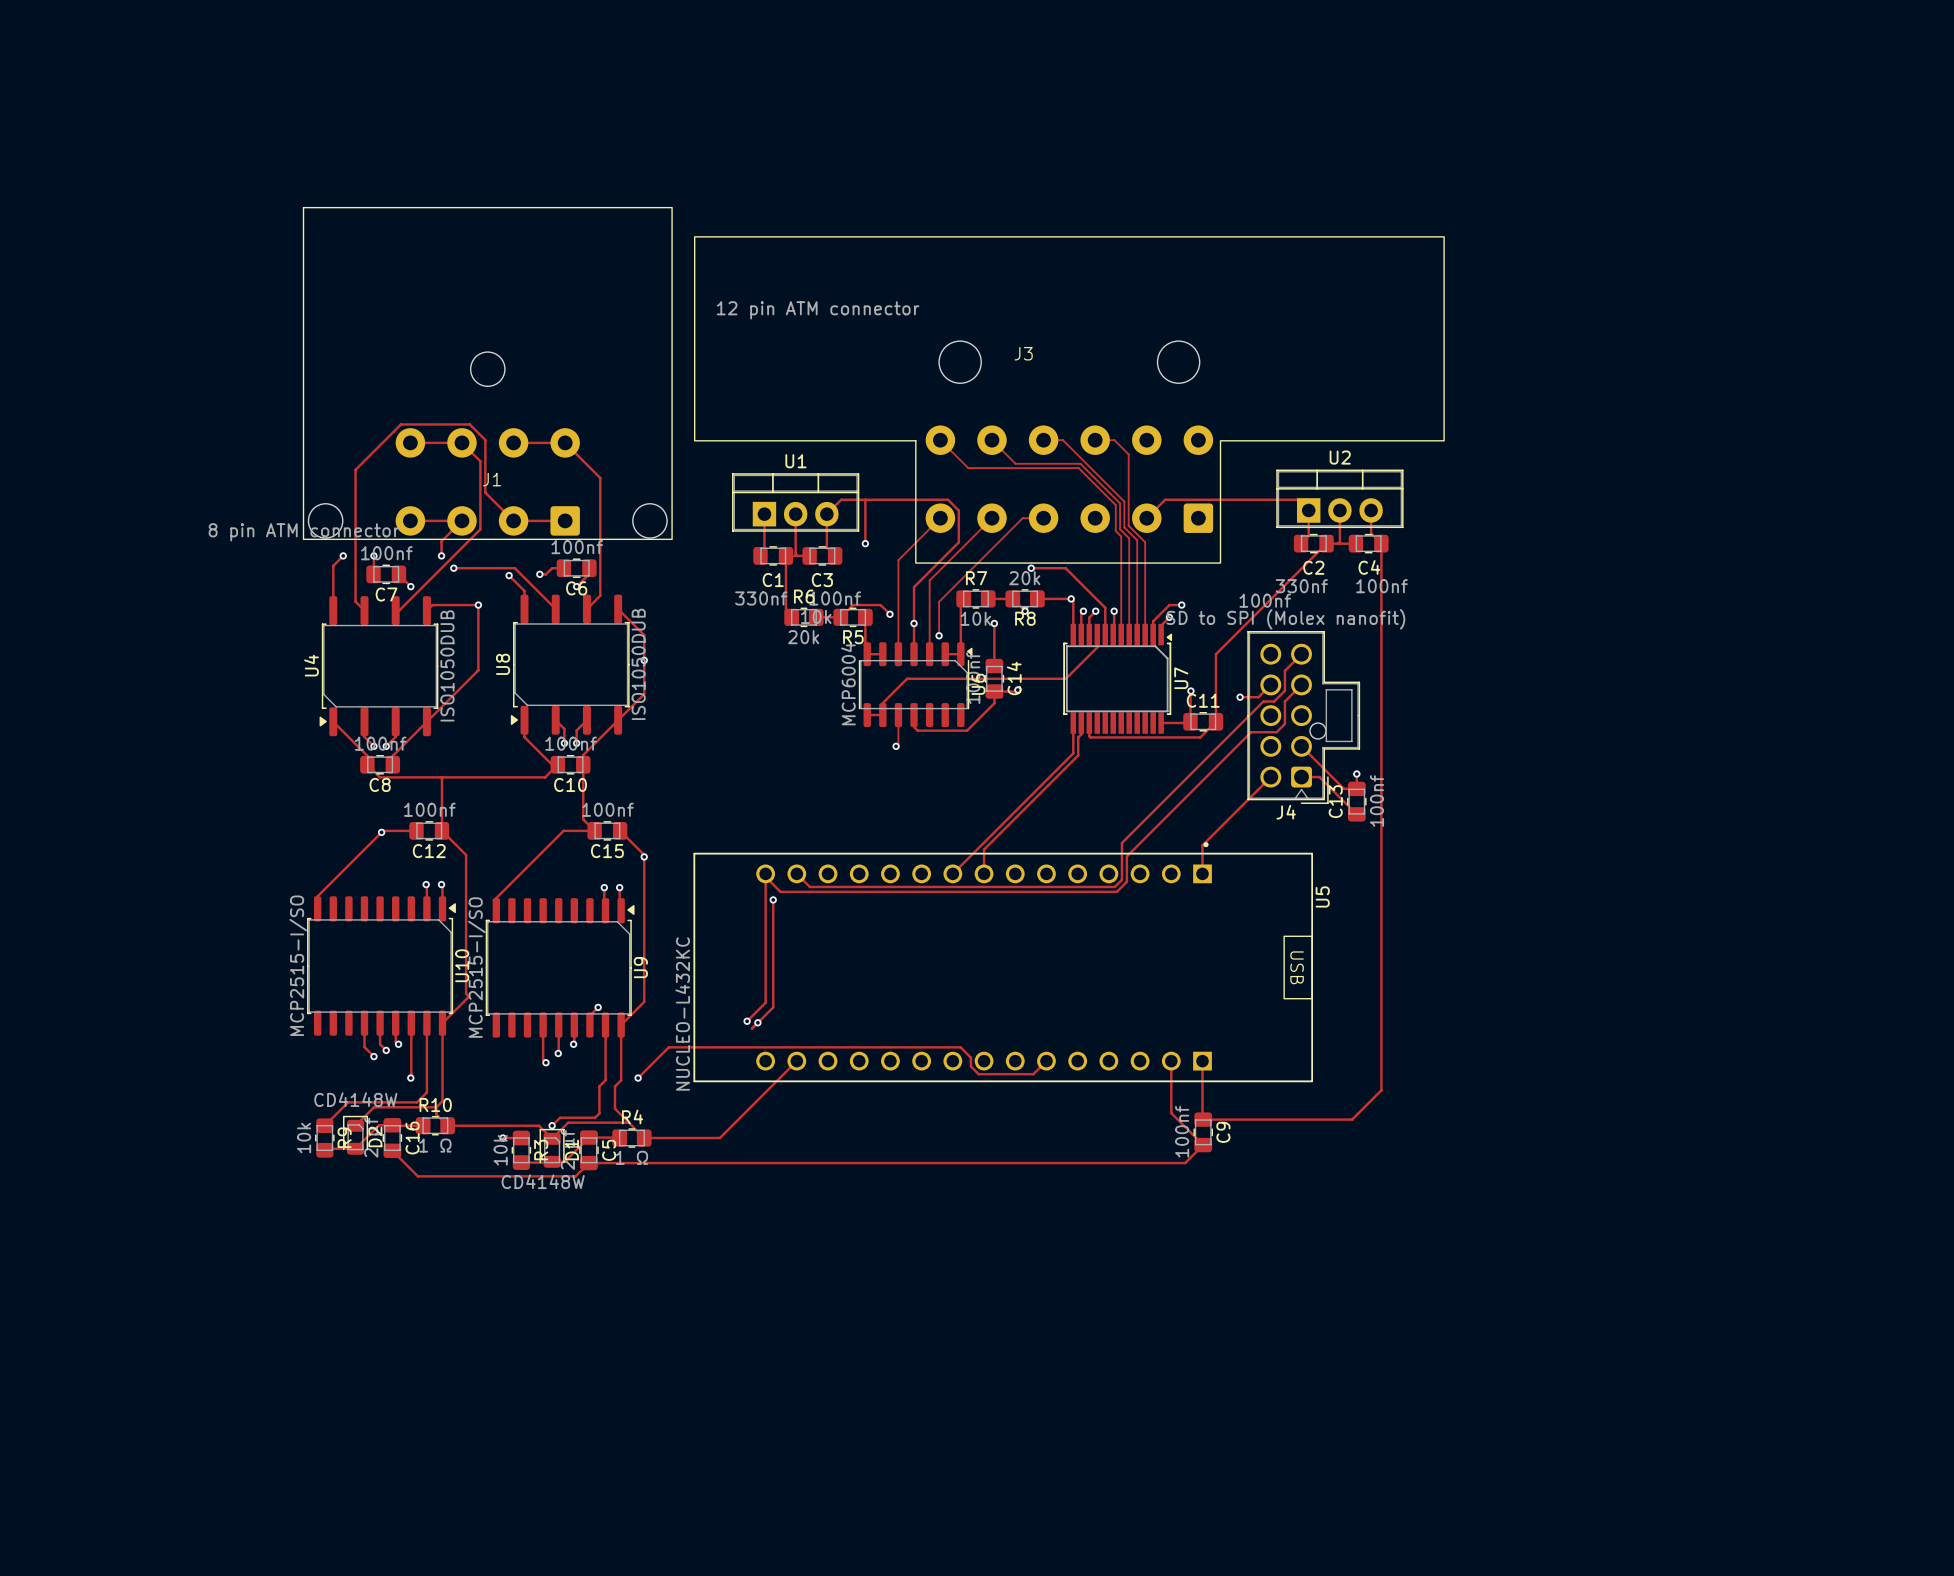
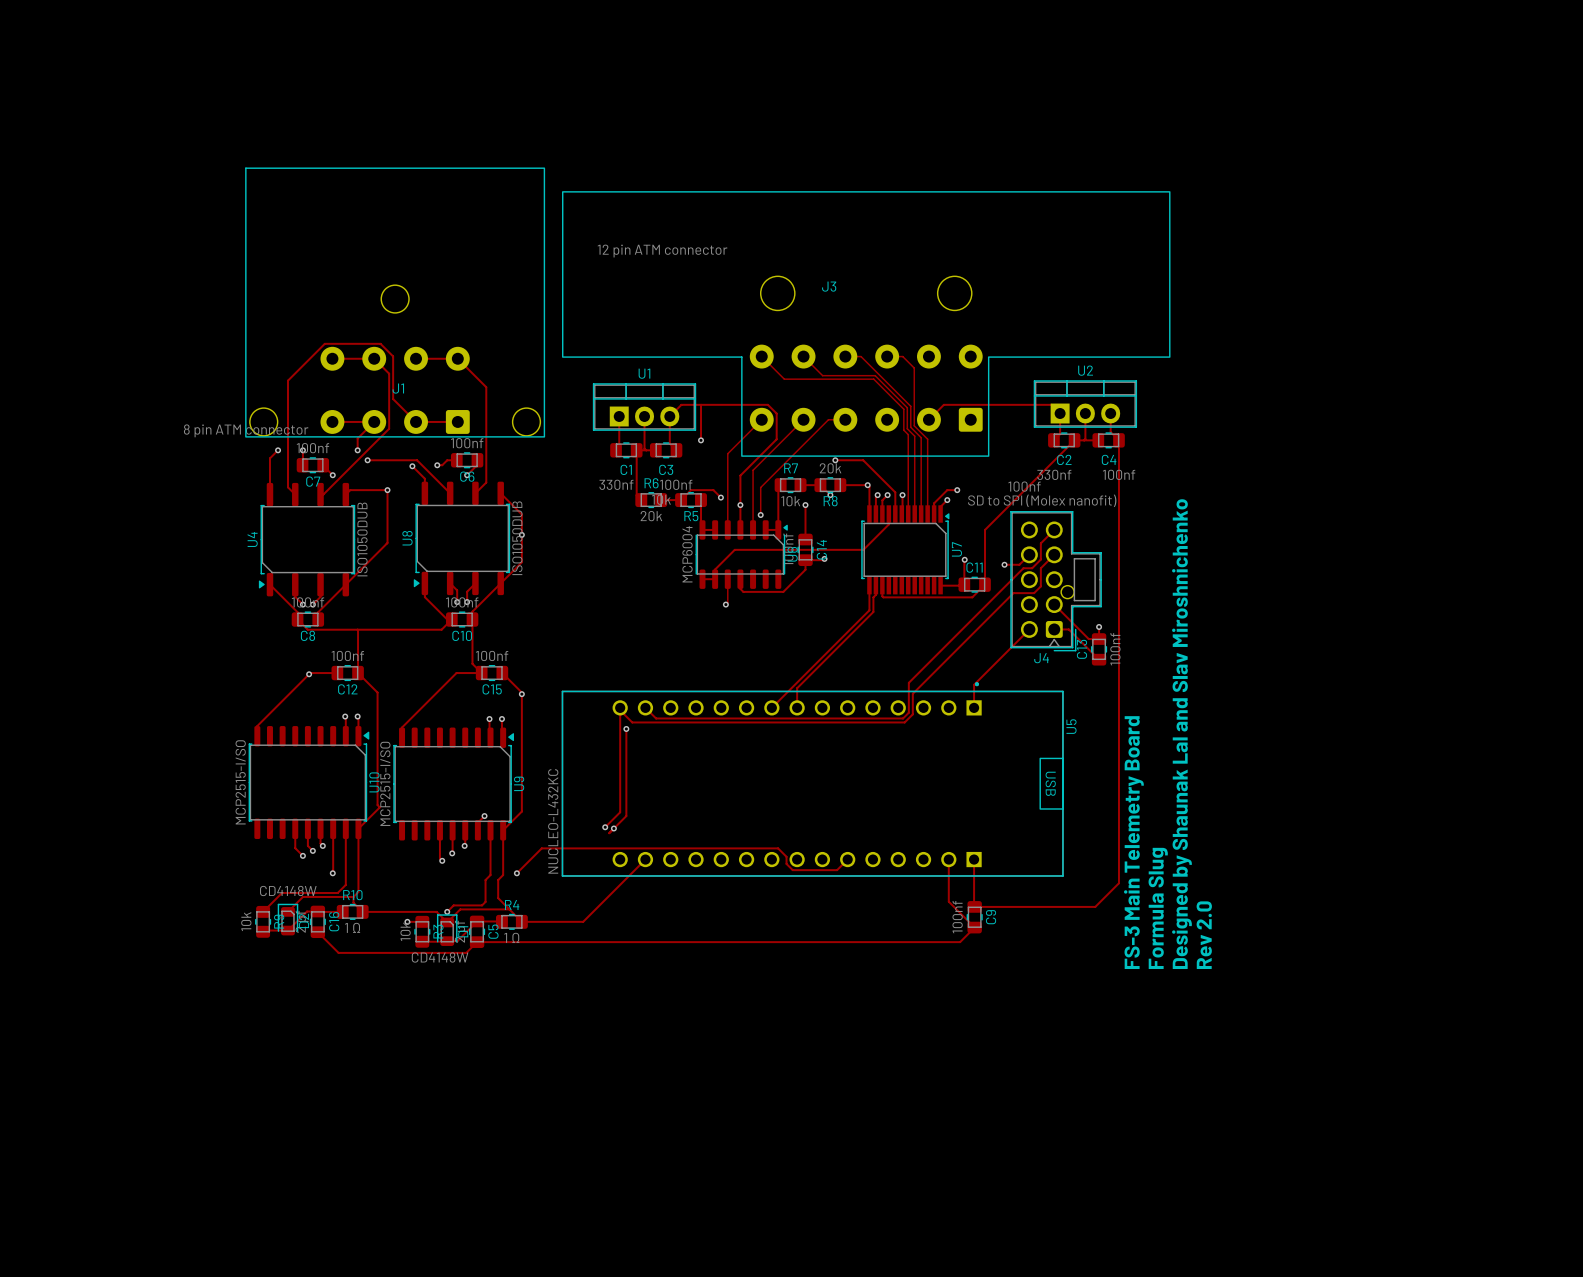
text: none -> Designed by Shaunak Lal and Slav Miroshnichenko (1182, 734)
text: none -> FS-3 Main Telemetry Board (1133, 842)
text: none -> Formula Slug (1158, 908)
text: none -> Rev 2.0 (1204, 935)

